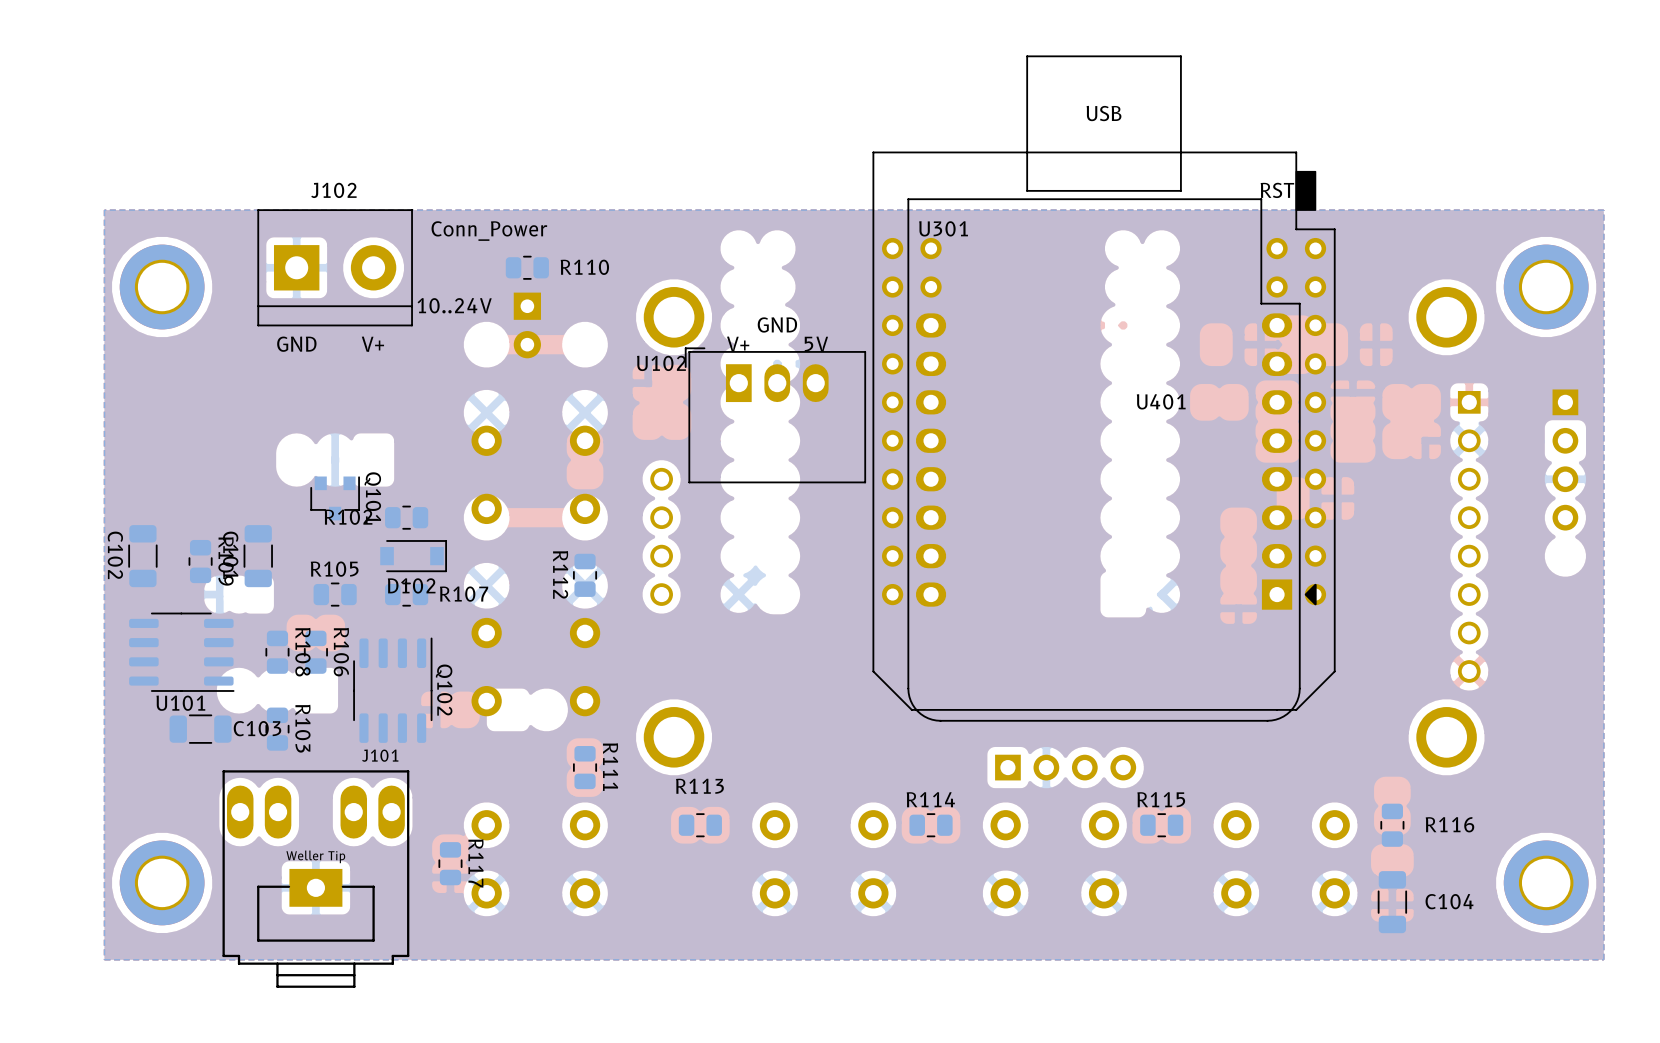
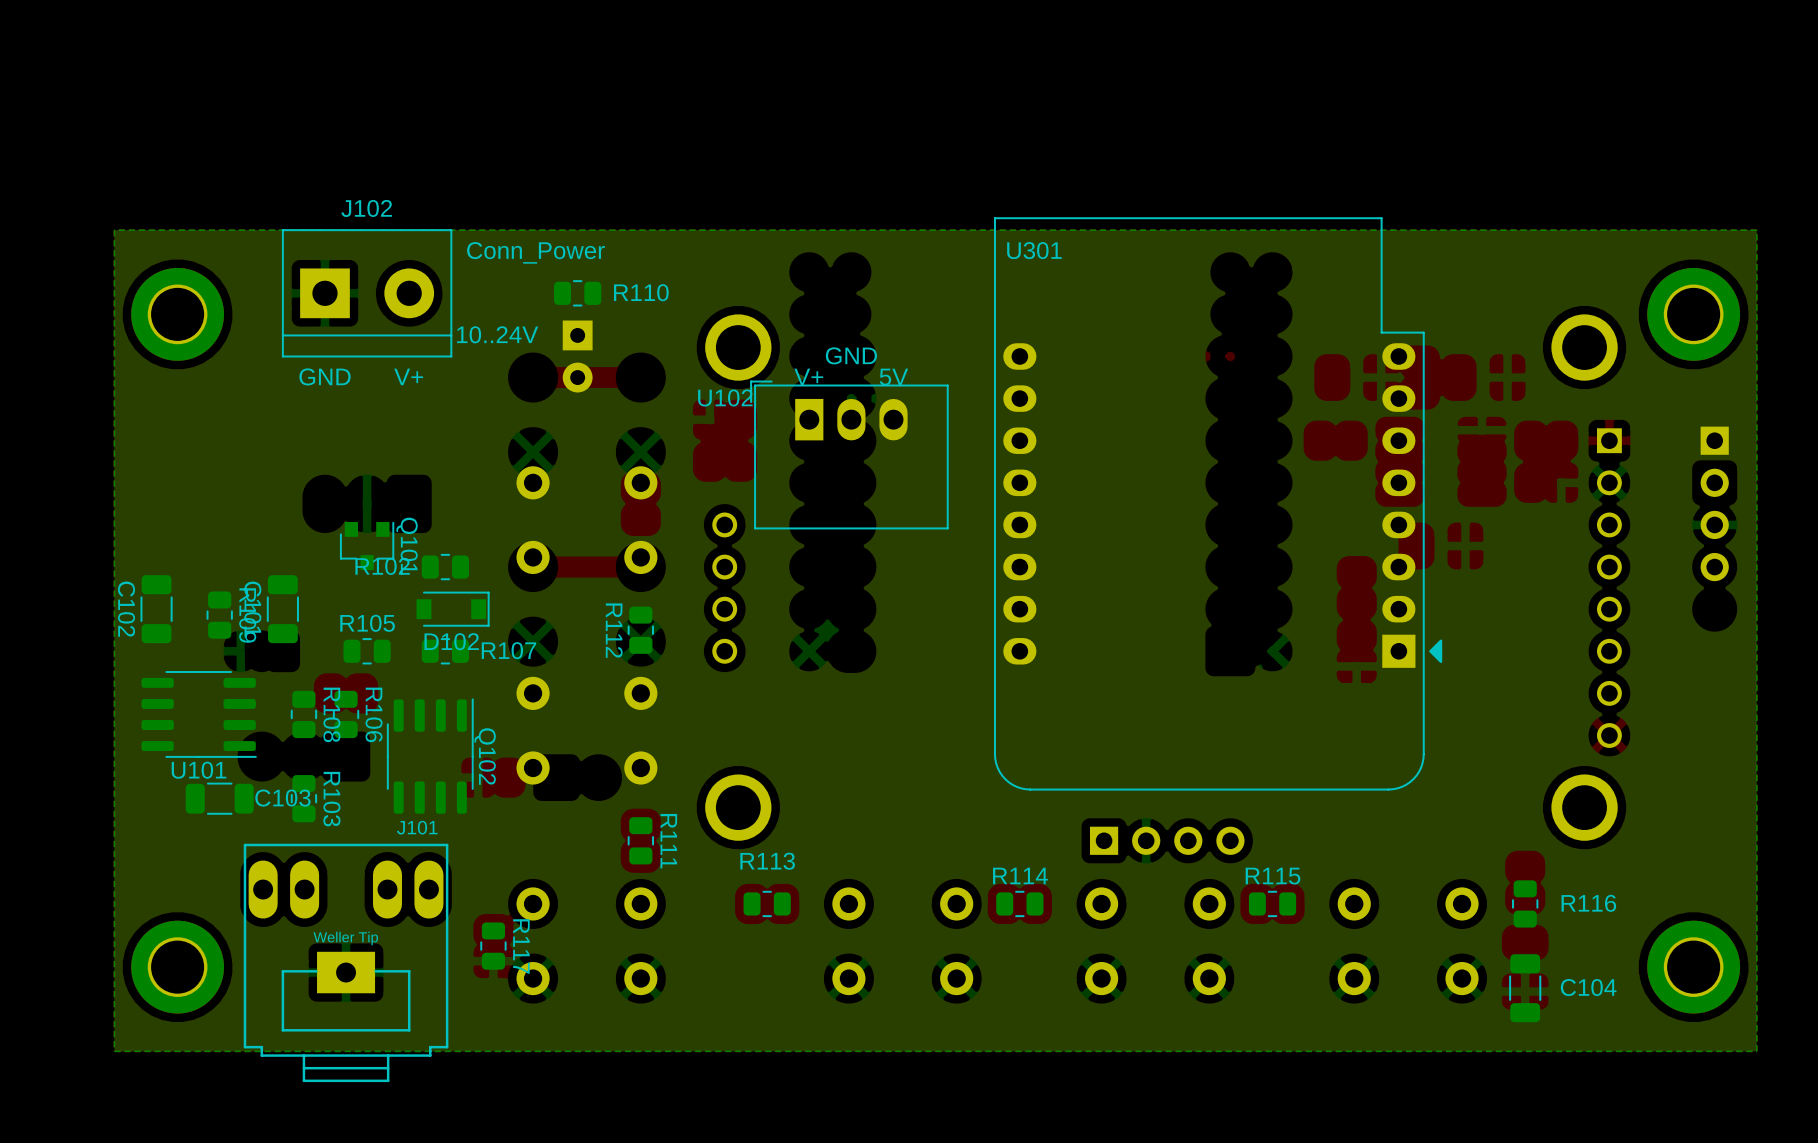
U401: (1104, 383) -> none

